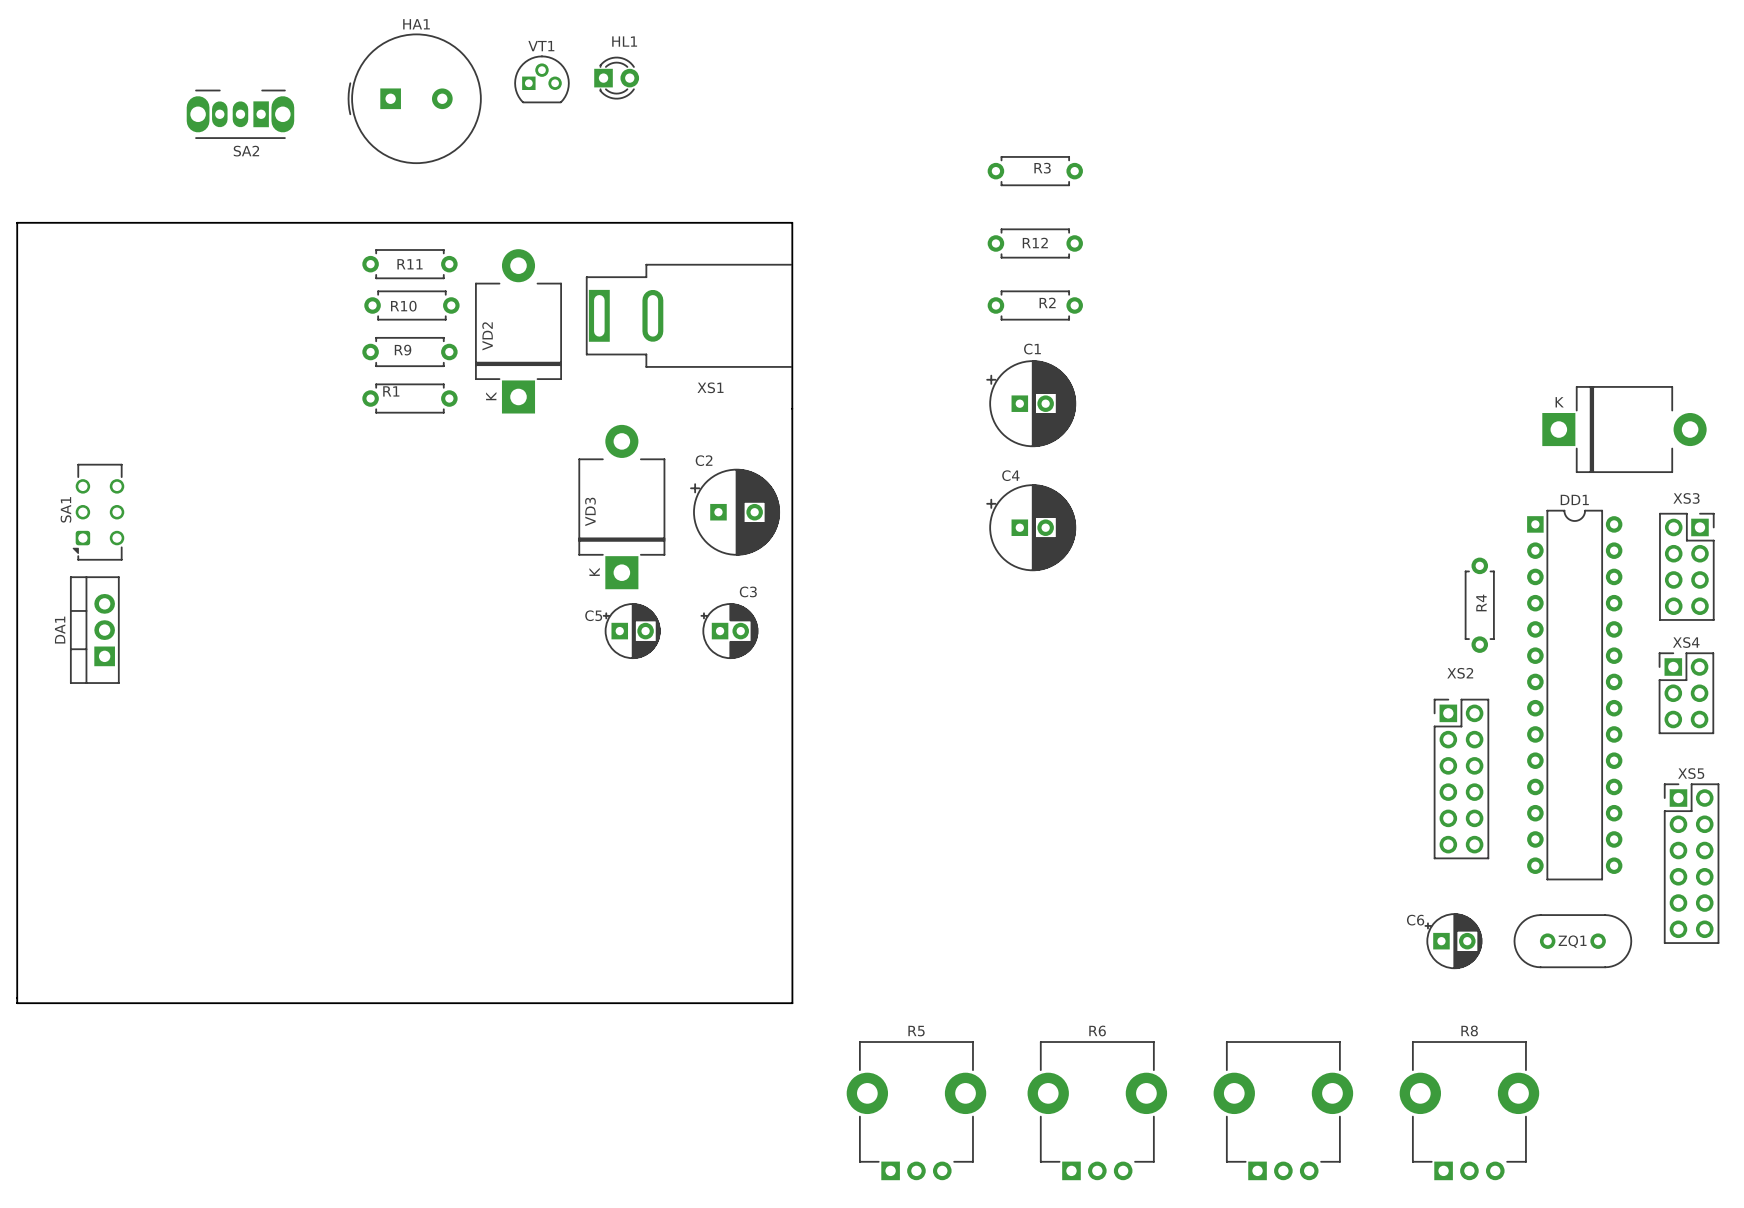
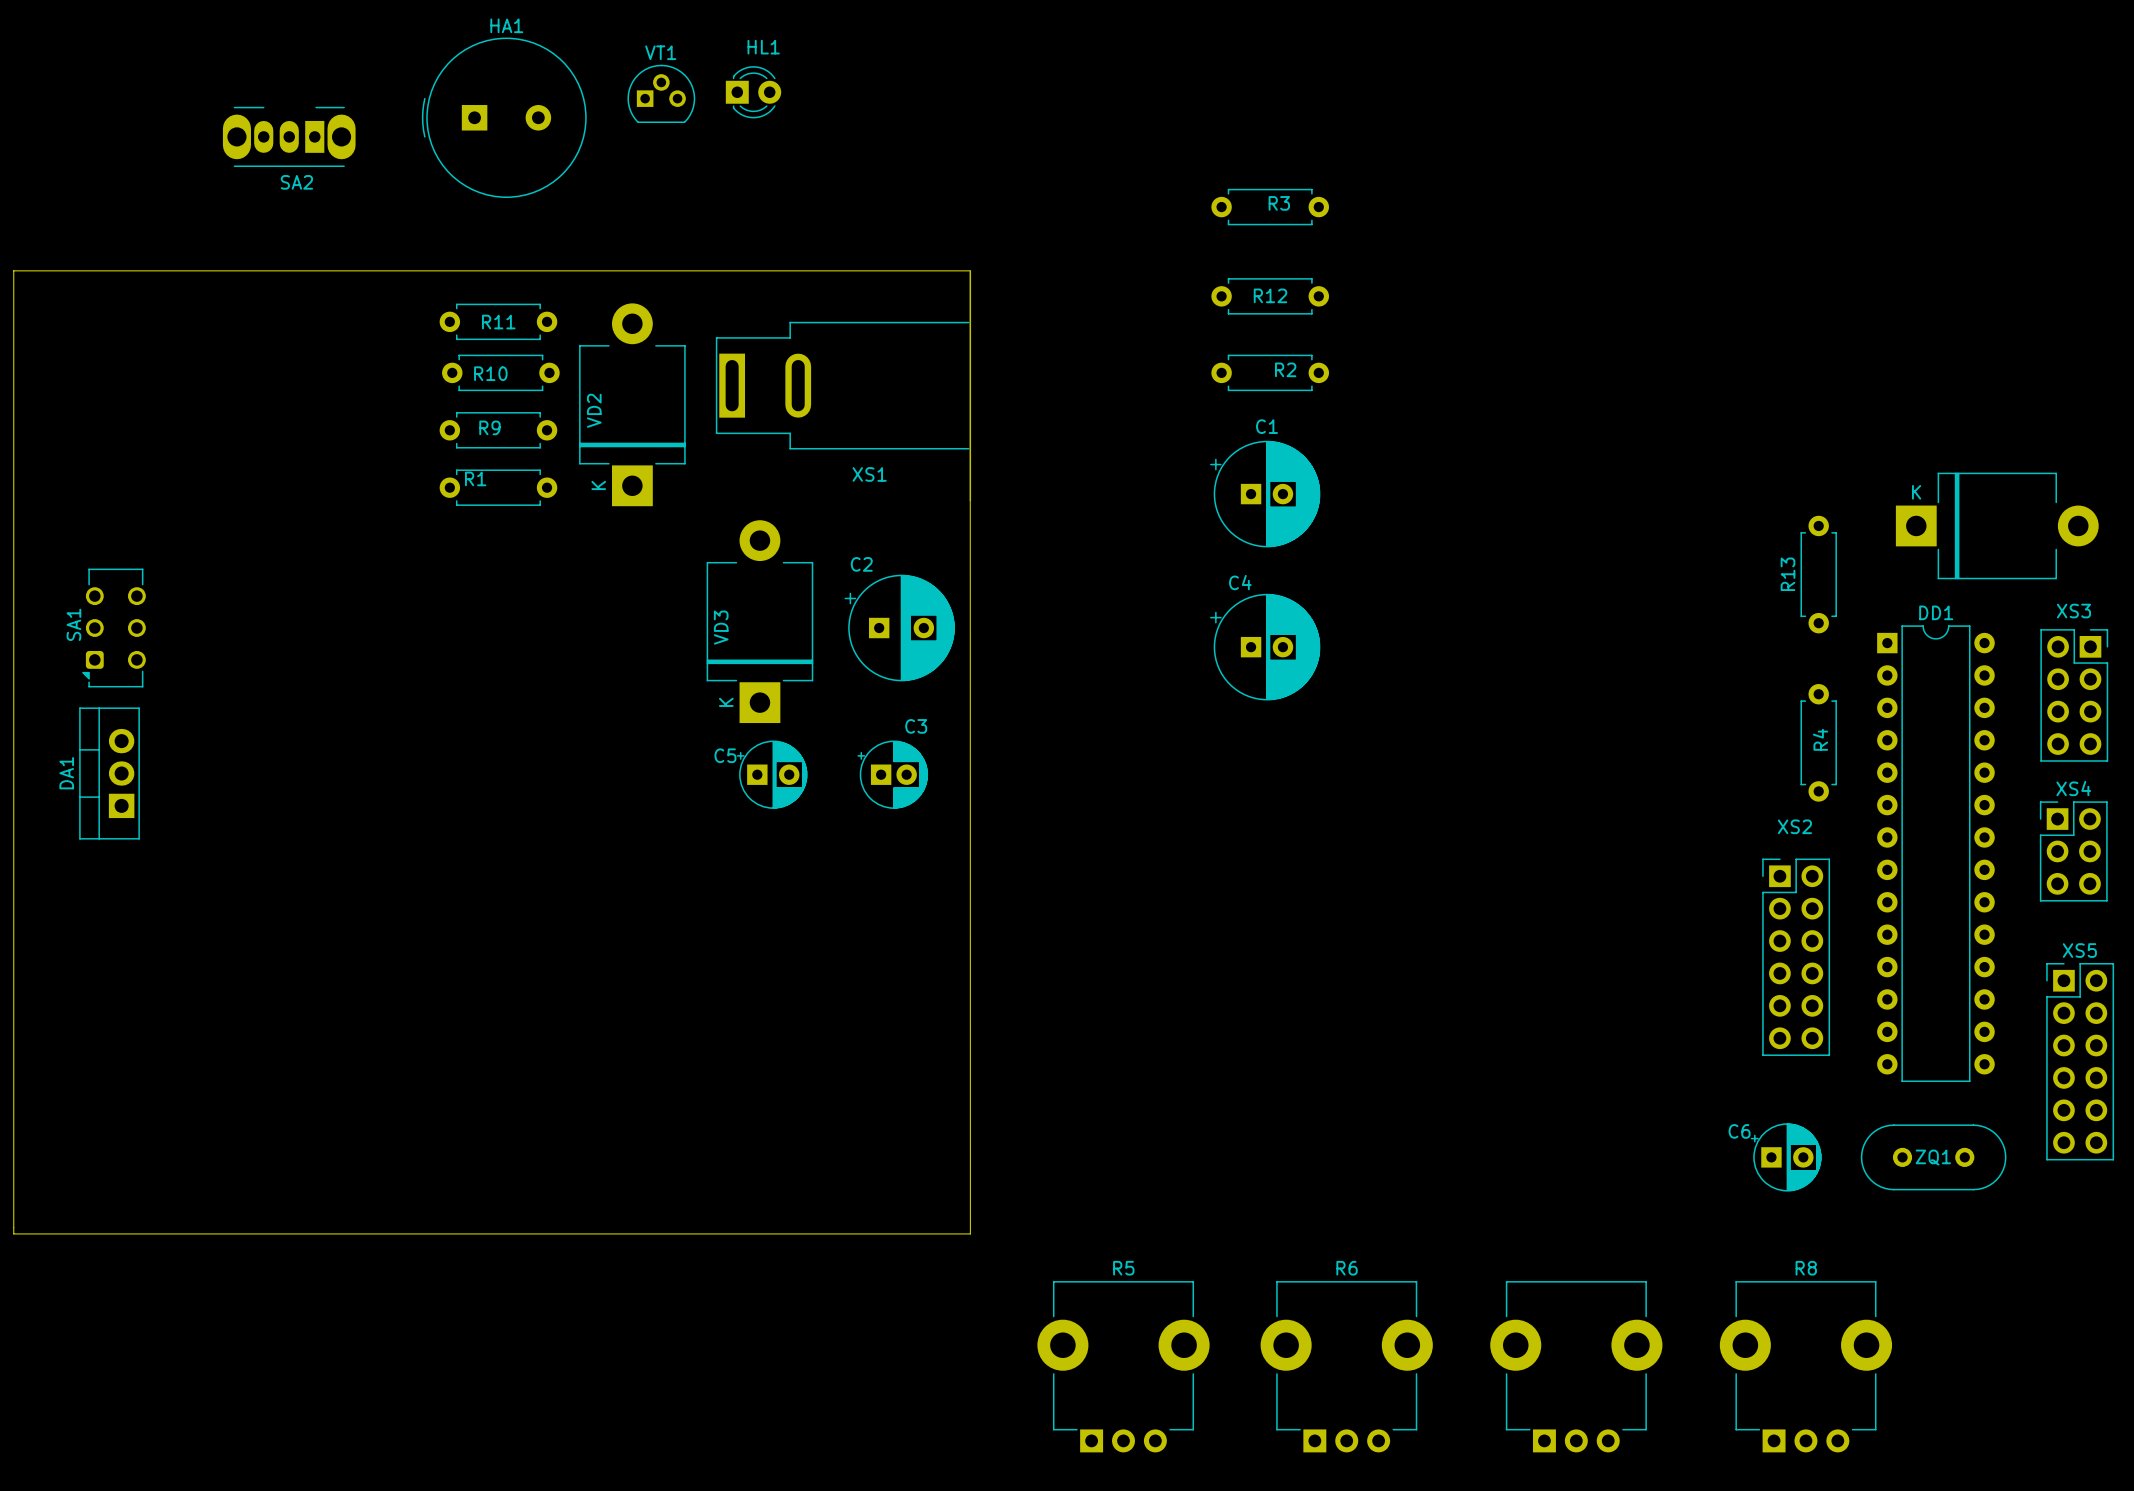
R13: none -> (1818, 574)

